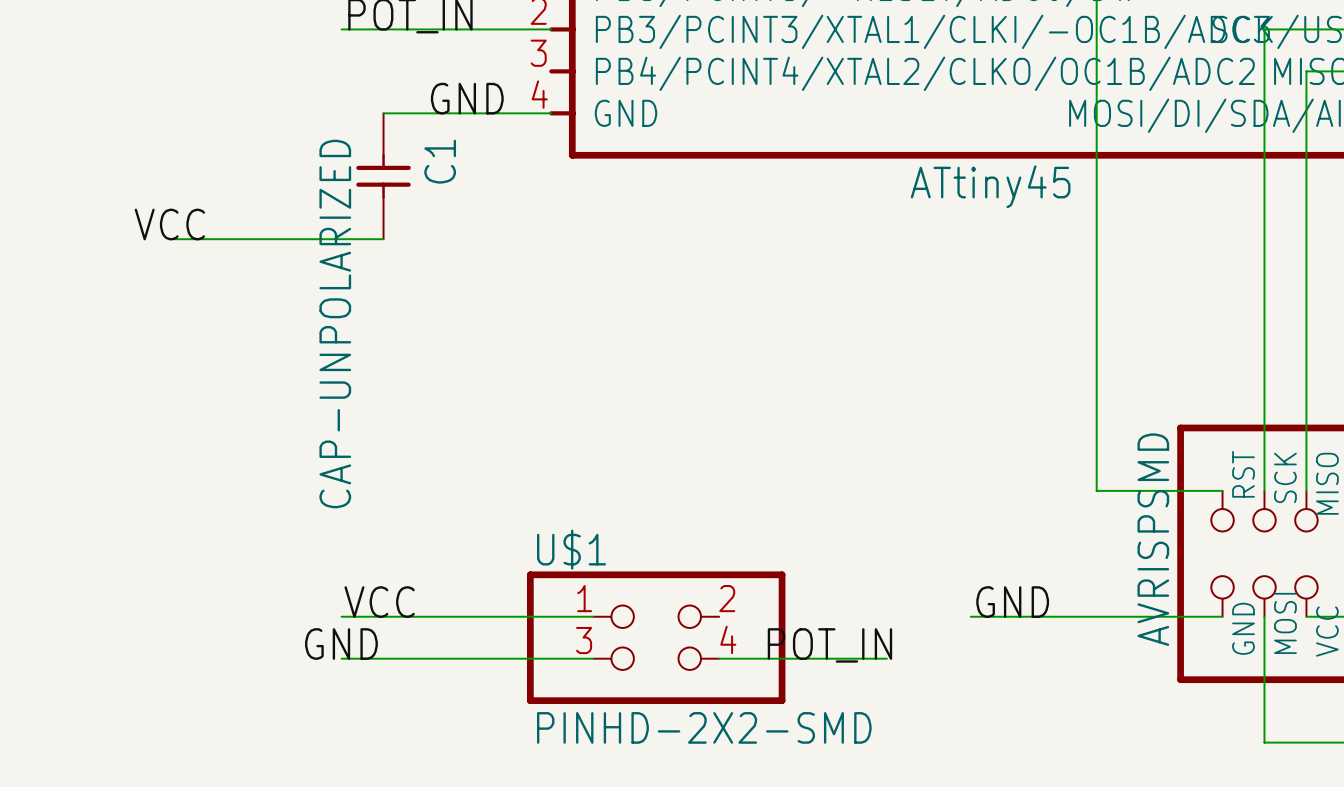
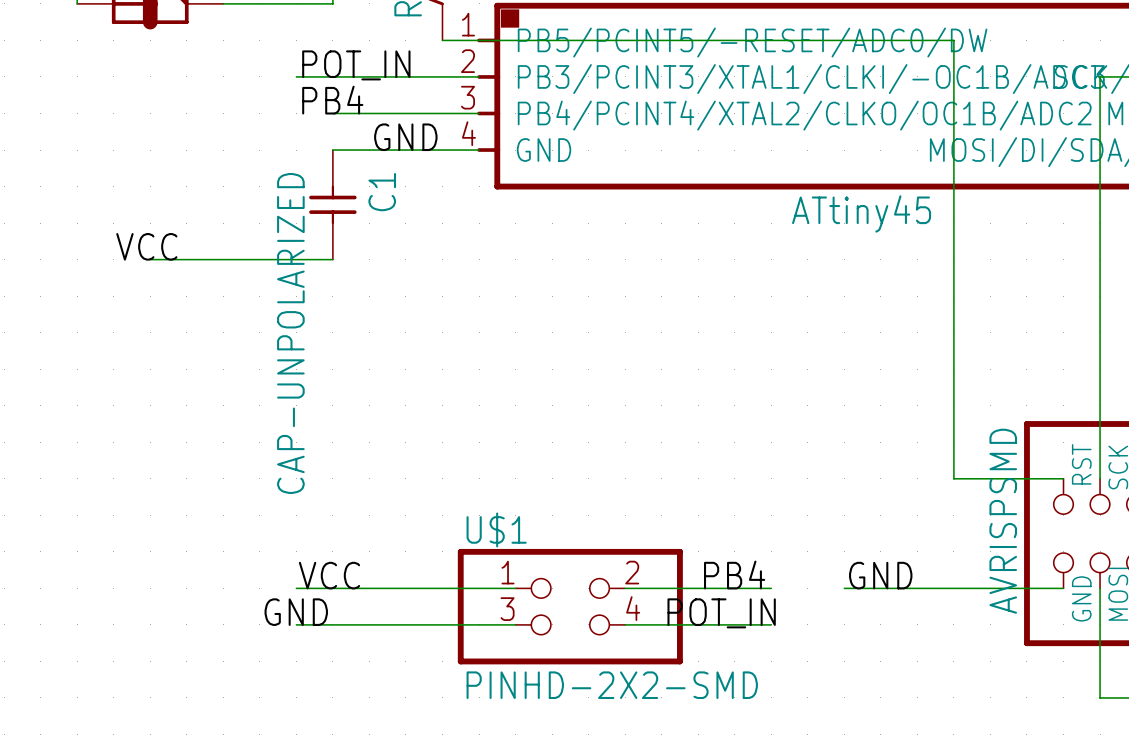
label: none -> PB4 (332, 100)
wire: none -> (332, 113) (479, 113)
label: none -> PB4 (734, 574)
wire: none -> (625, 588) (771, 588)

